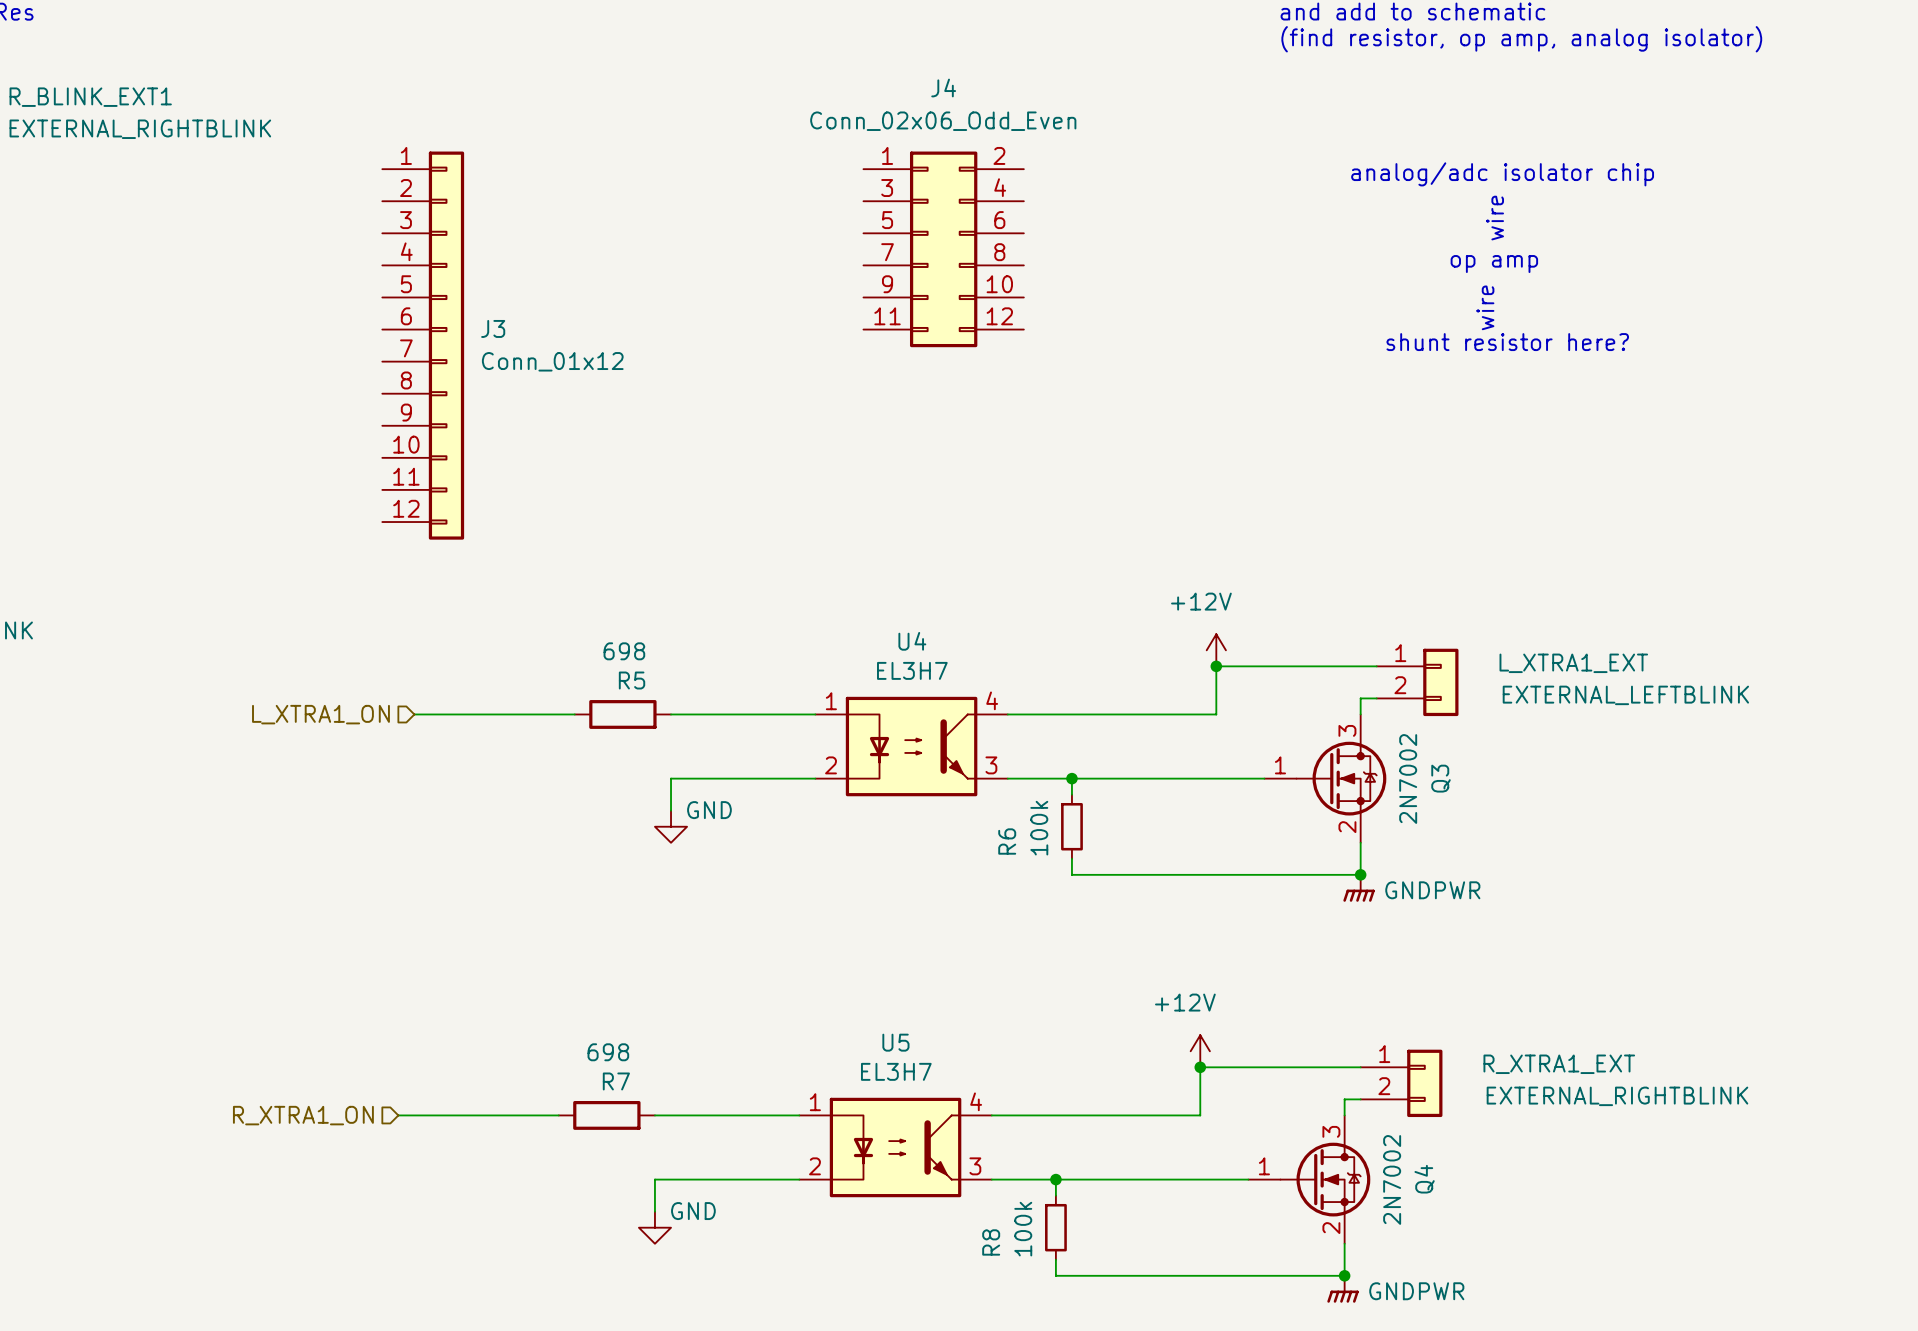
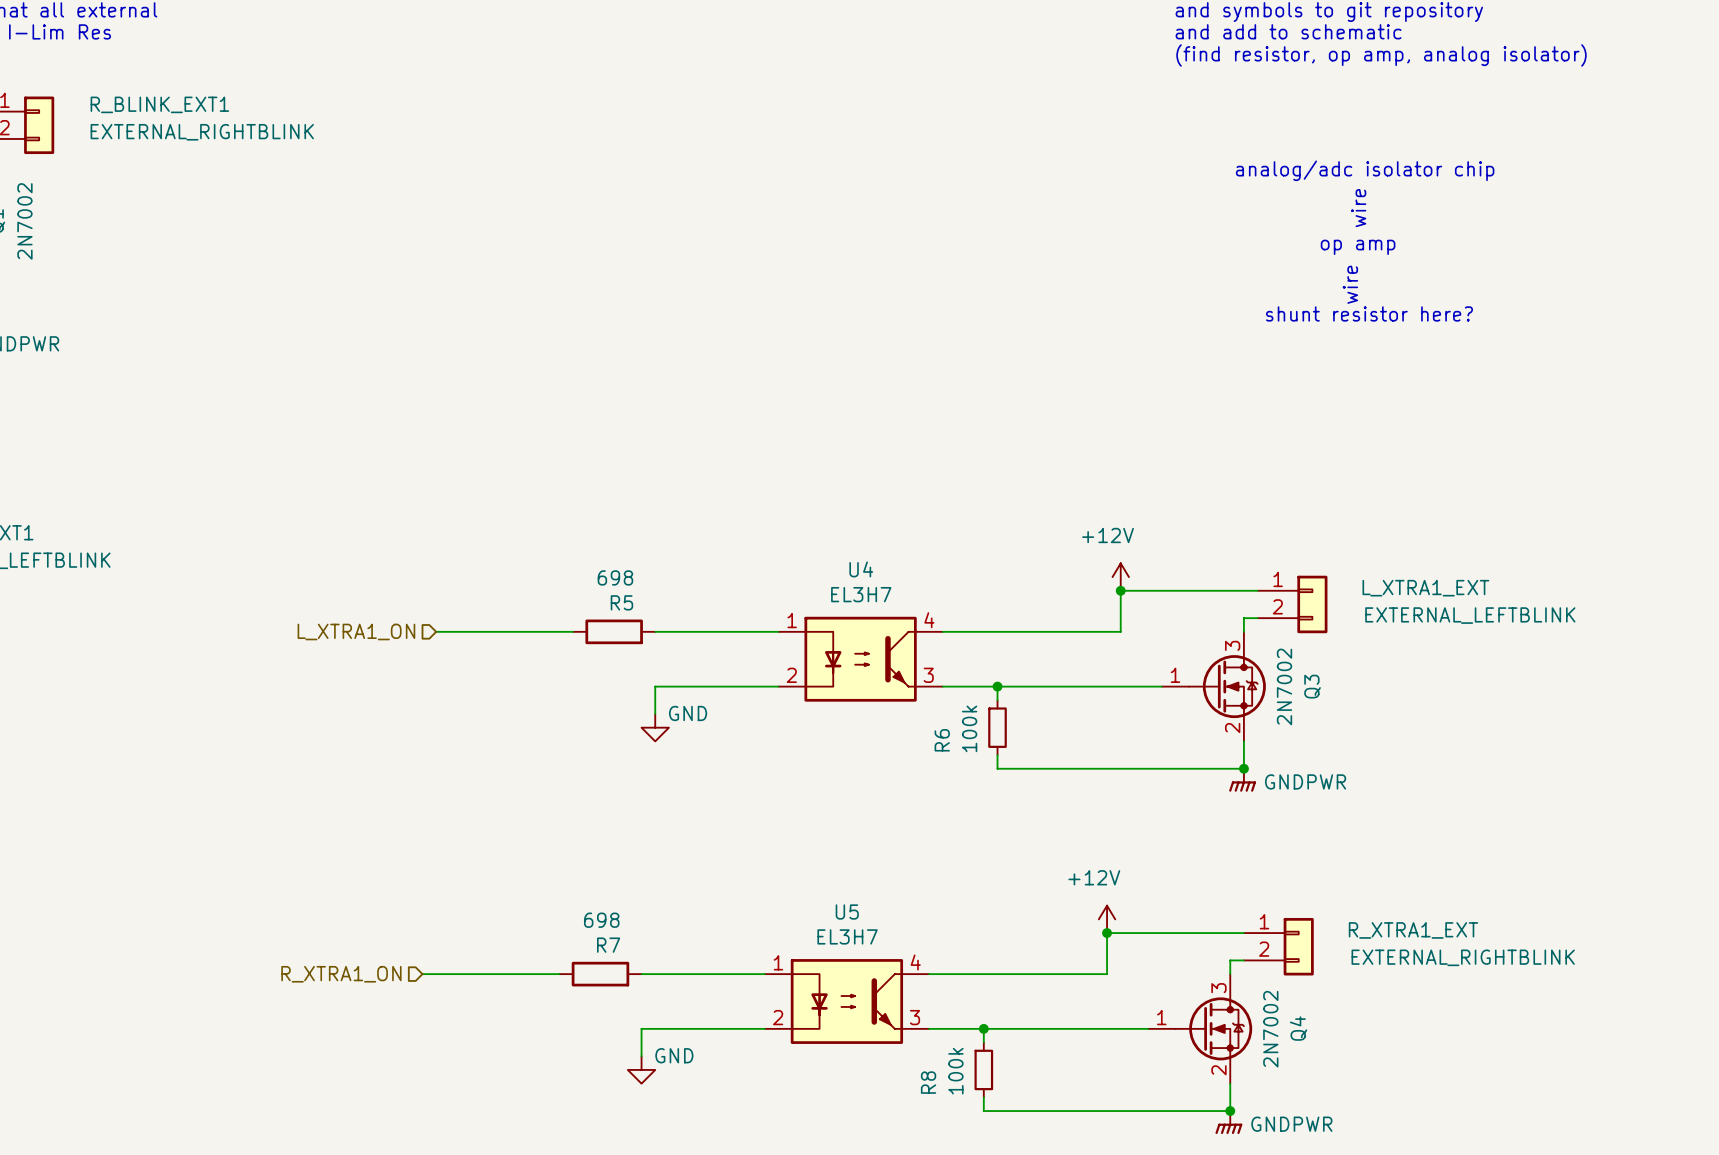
J4: Conn_02x06_Odd_Even (943, 249) -> none
J3: Conn_01x12 (423, 345) -> none

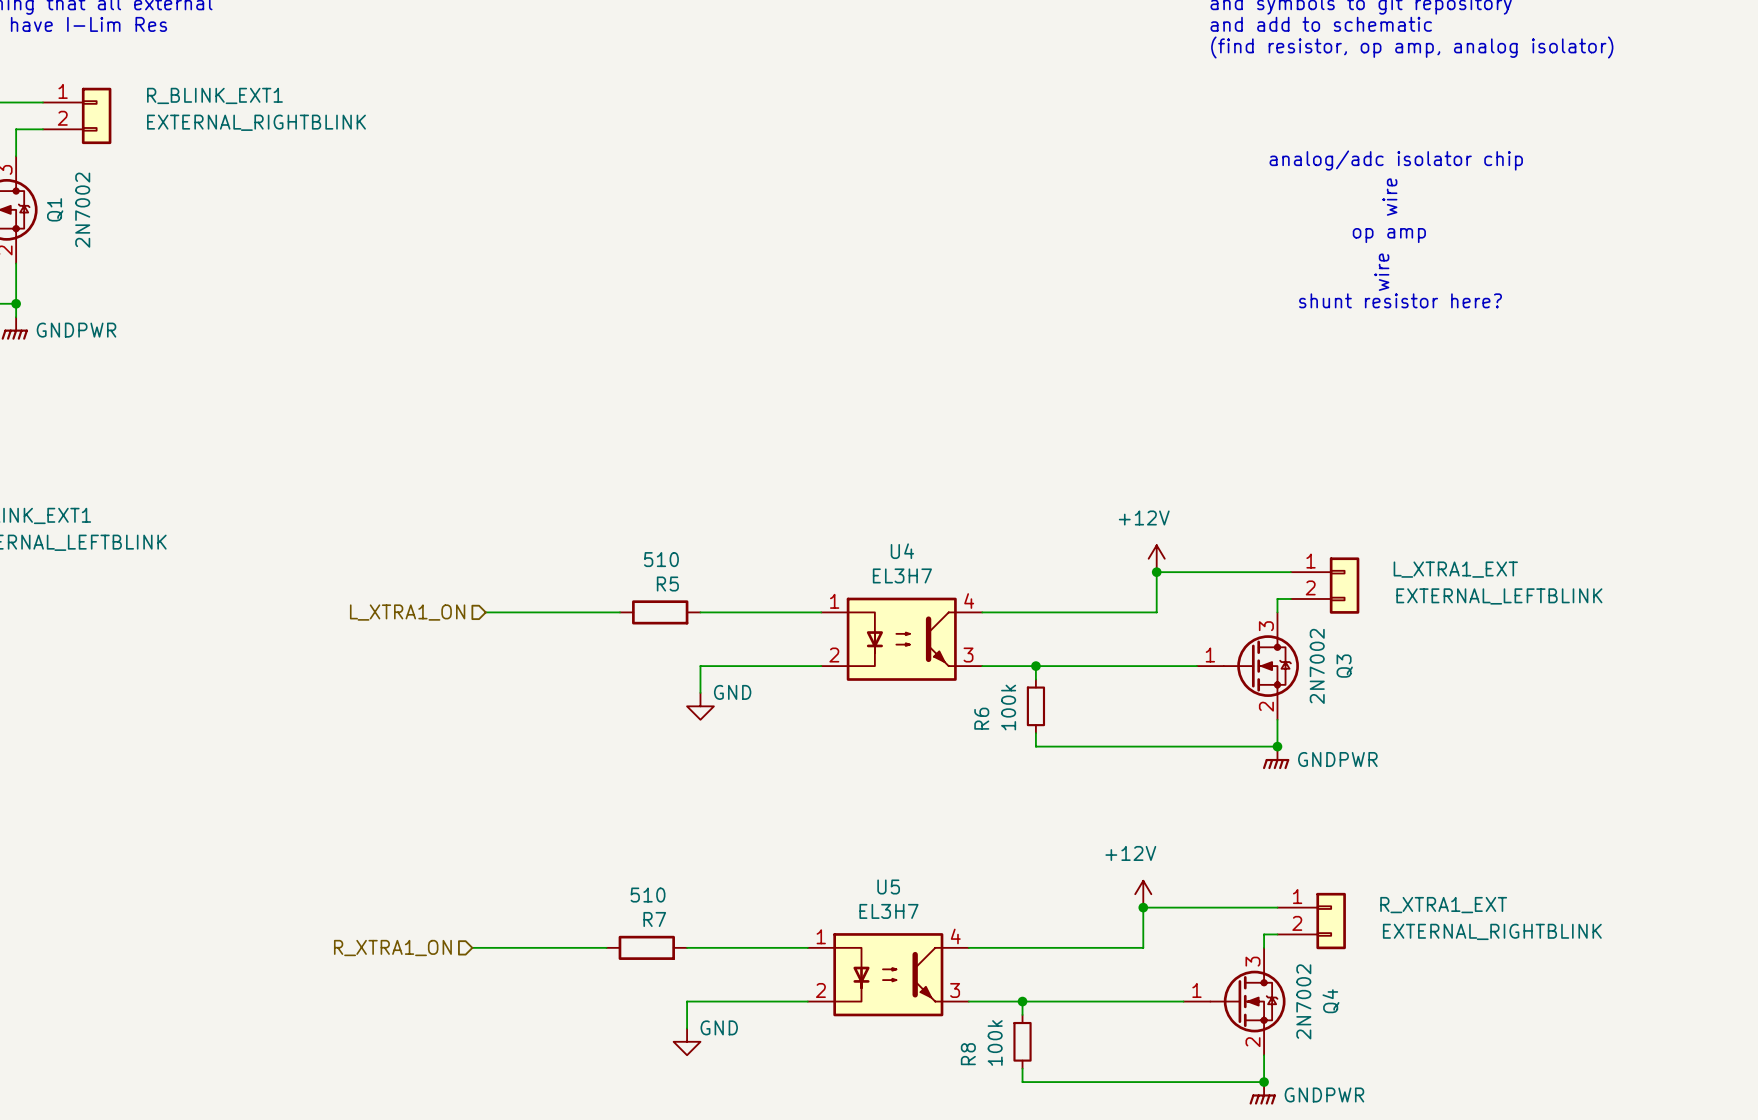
R5 value: 698 (615, 577) -> 510 (661, 559)
R7 value: 698 (601, 920) -> 510 (648, 895)

